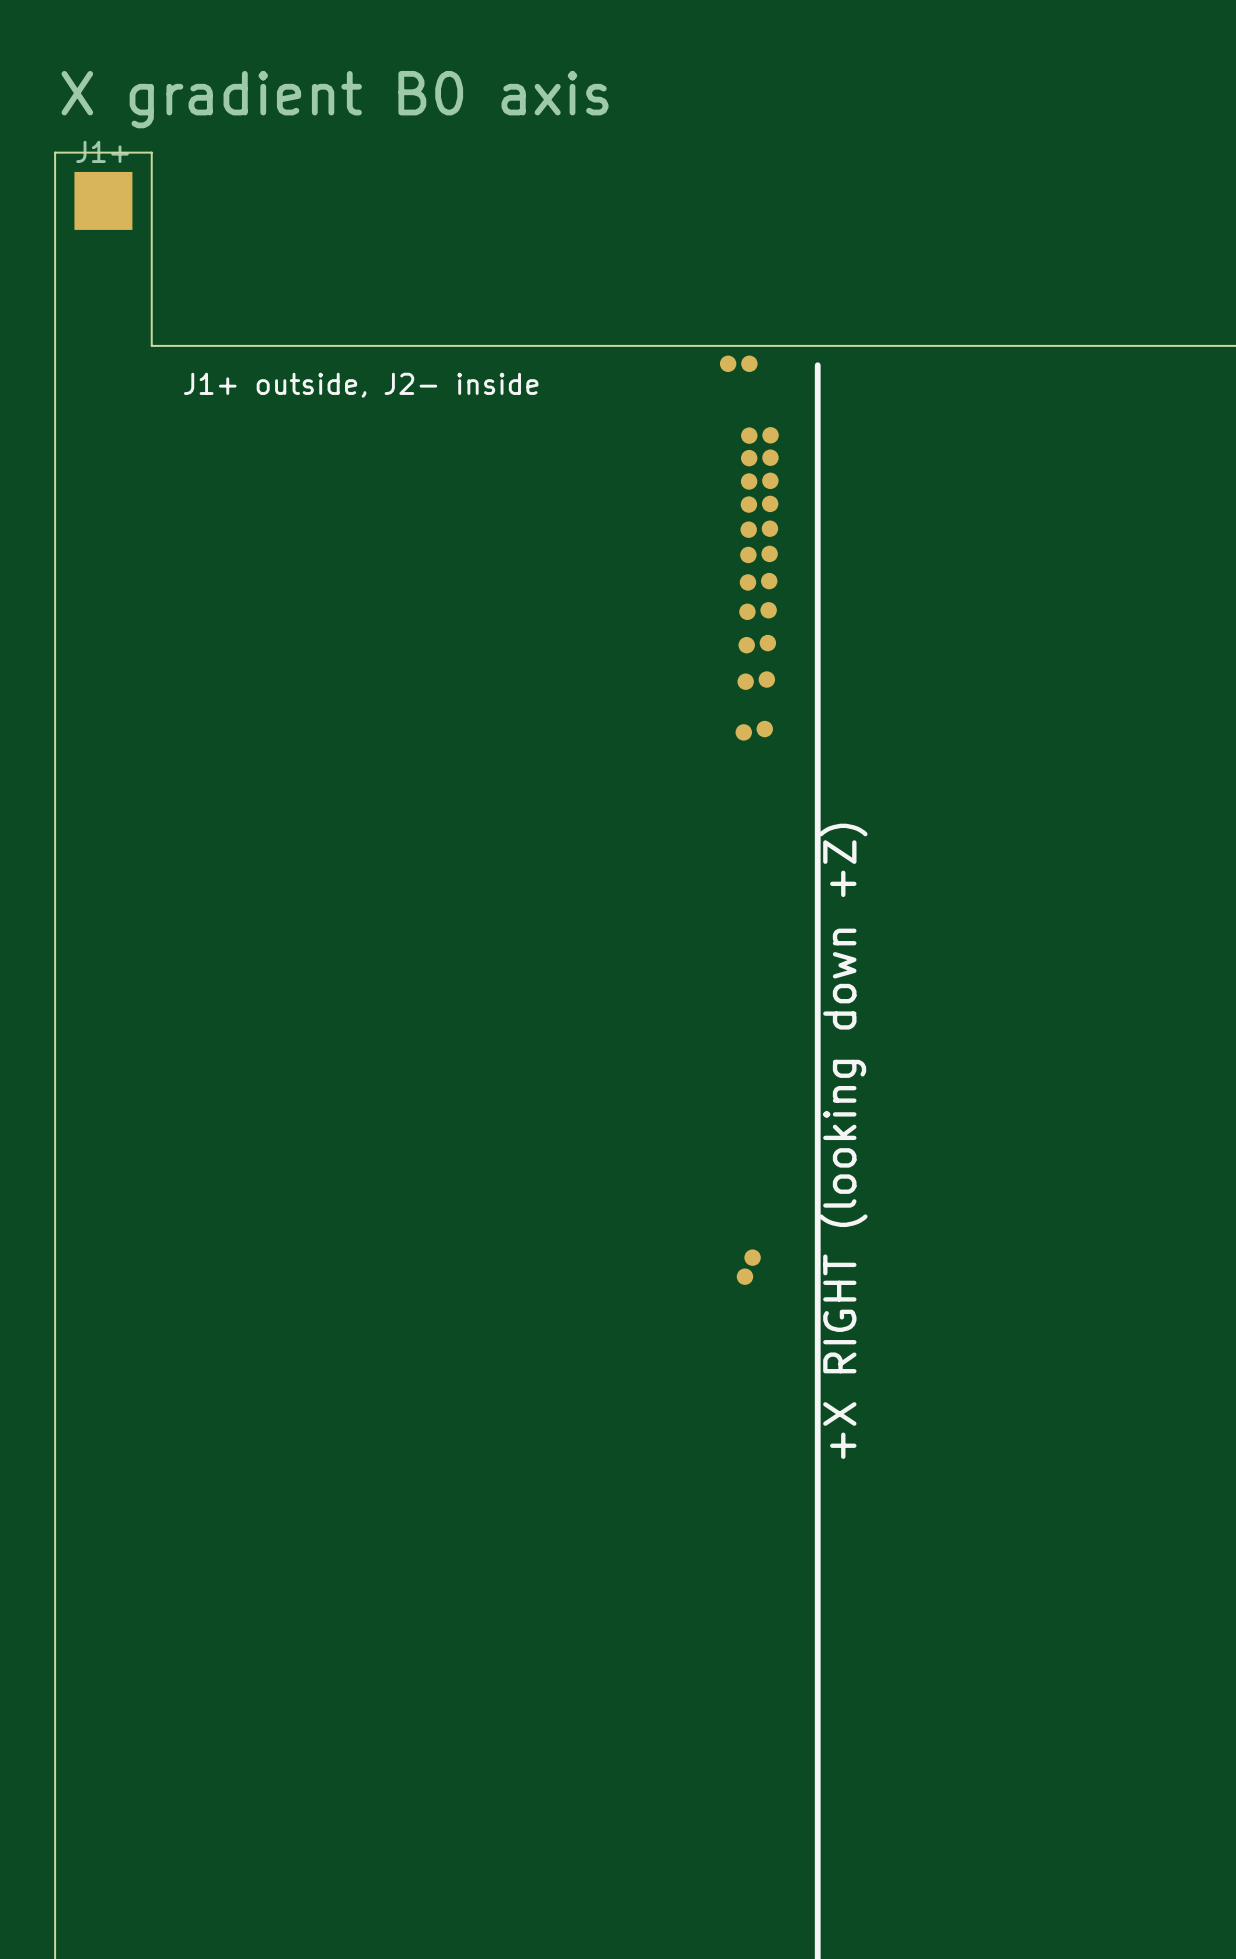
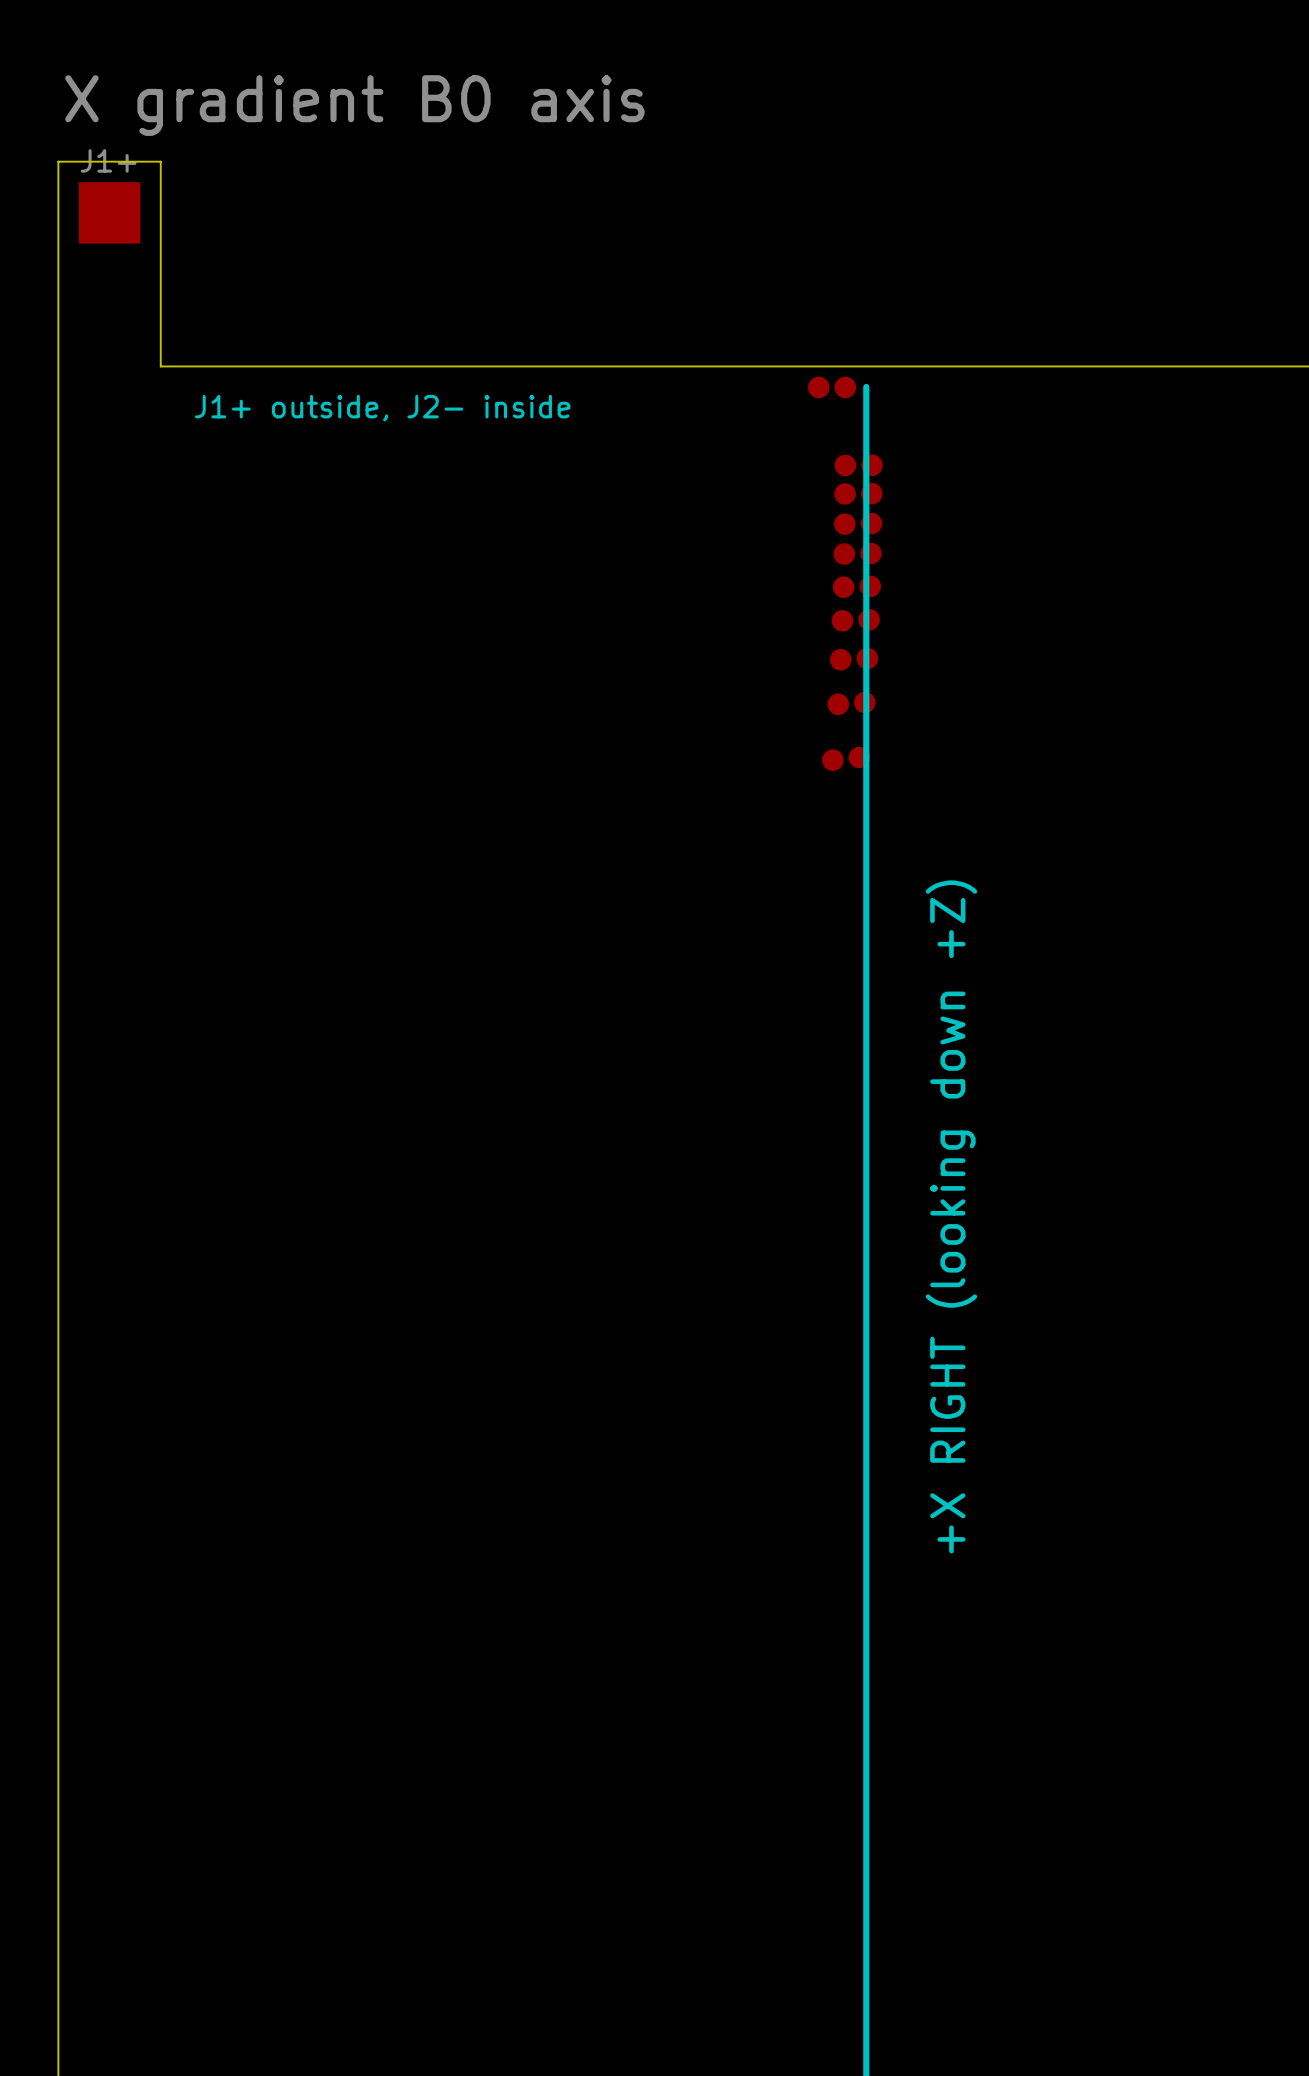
part: (738, 363) -> none
part: none -> (832, 387)
part: (759, 435) -> none
part: none -> (858, 465)
part: (759, 457) -> none
part: none -> (858, 493)
part: (759, 481) -> none
part: none -> (858, 523)
part: (759, 504) -> none
part: none -> (857, 553)
part: (759, 529) -> none
part: none -> (856, 586)
part: (758, 554) -> none
part: (758, 581) -> none
part: none -> (855, 620)
part: (758, 611) -> none
part: none -> (854, 659)
part: (757, 644) -> none
part: none -> (851, 703)
part: (756, 680) -> none
part: none -> (846, 758)
part: (754, 730) -> none
text position: +X RIGHT (looking down +Z) (843, 1141) -> +X RIGHT (looking down +Z) (951, 1216)
part: (748, 1267) -> none

